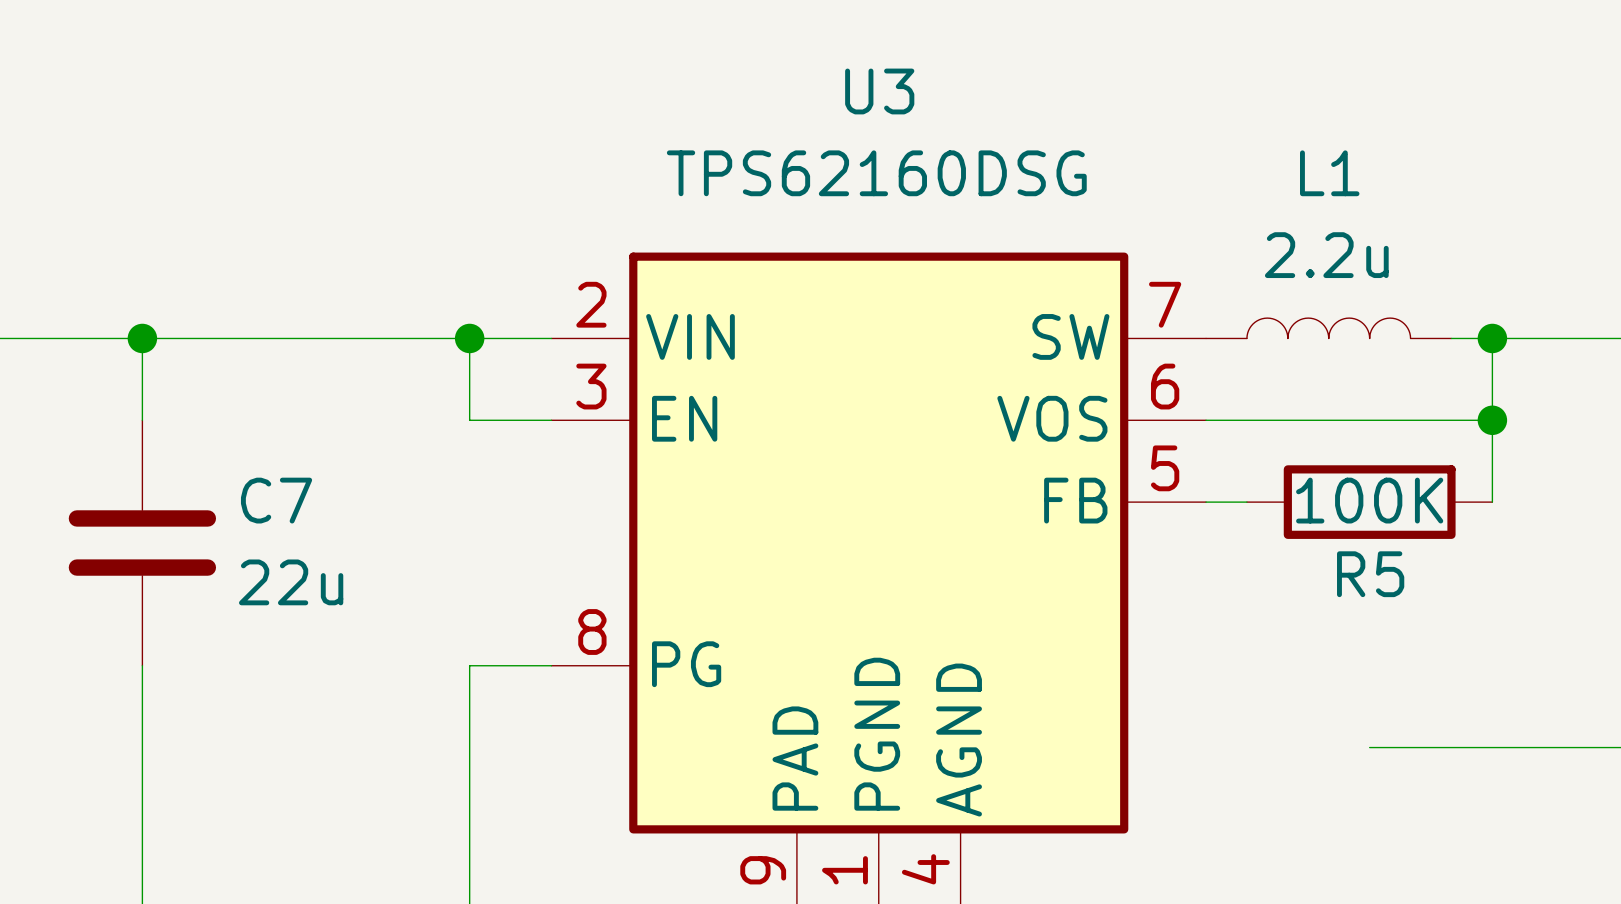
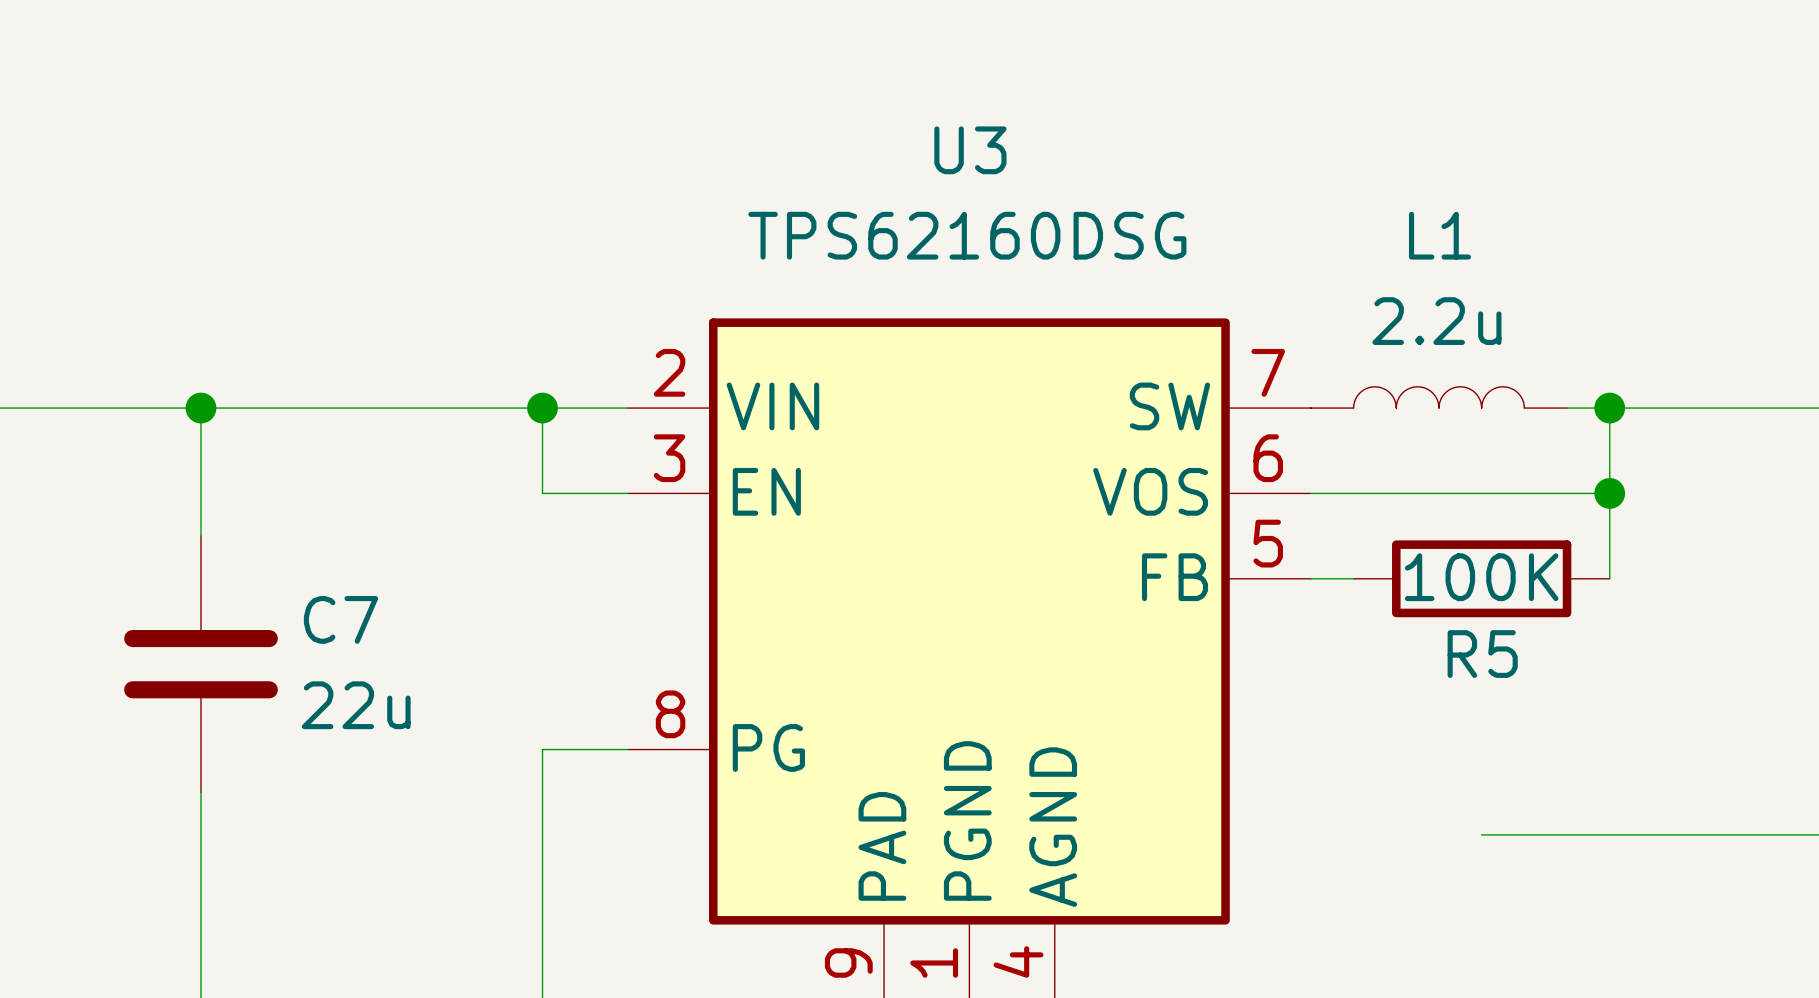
C7 position: (142, 543) -> (201, 664)

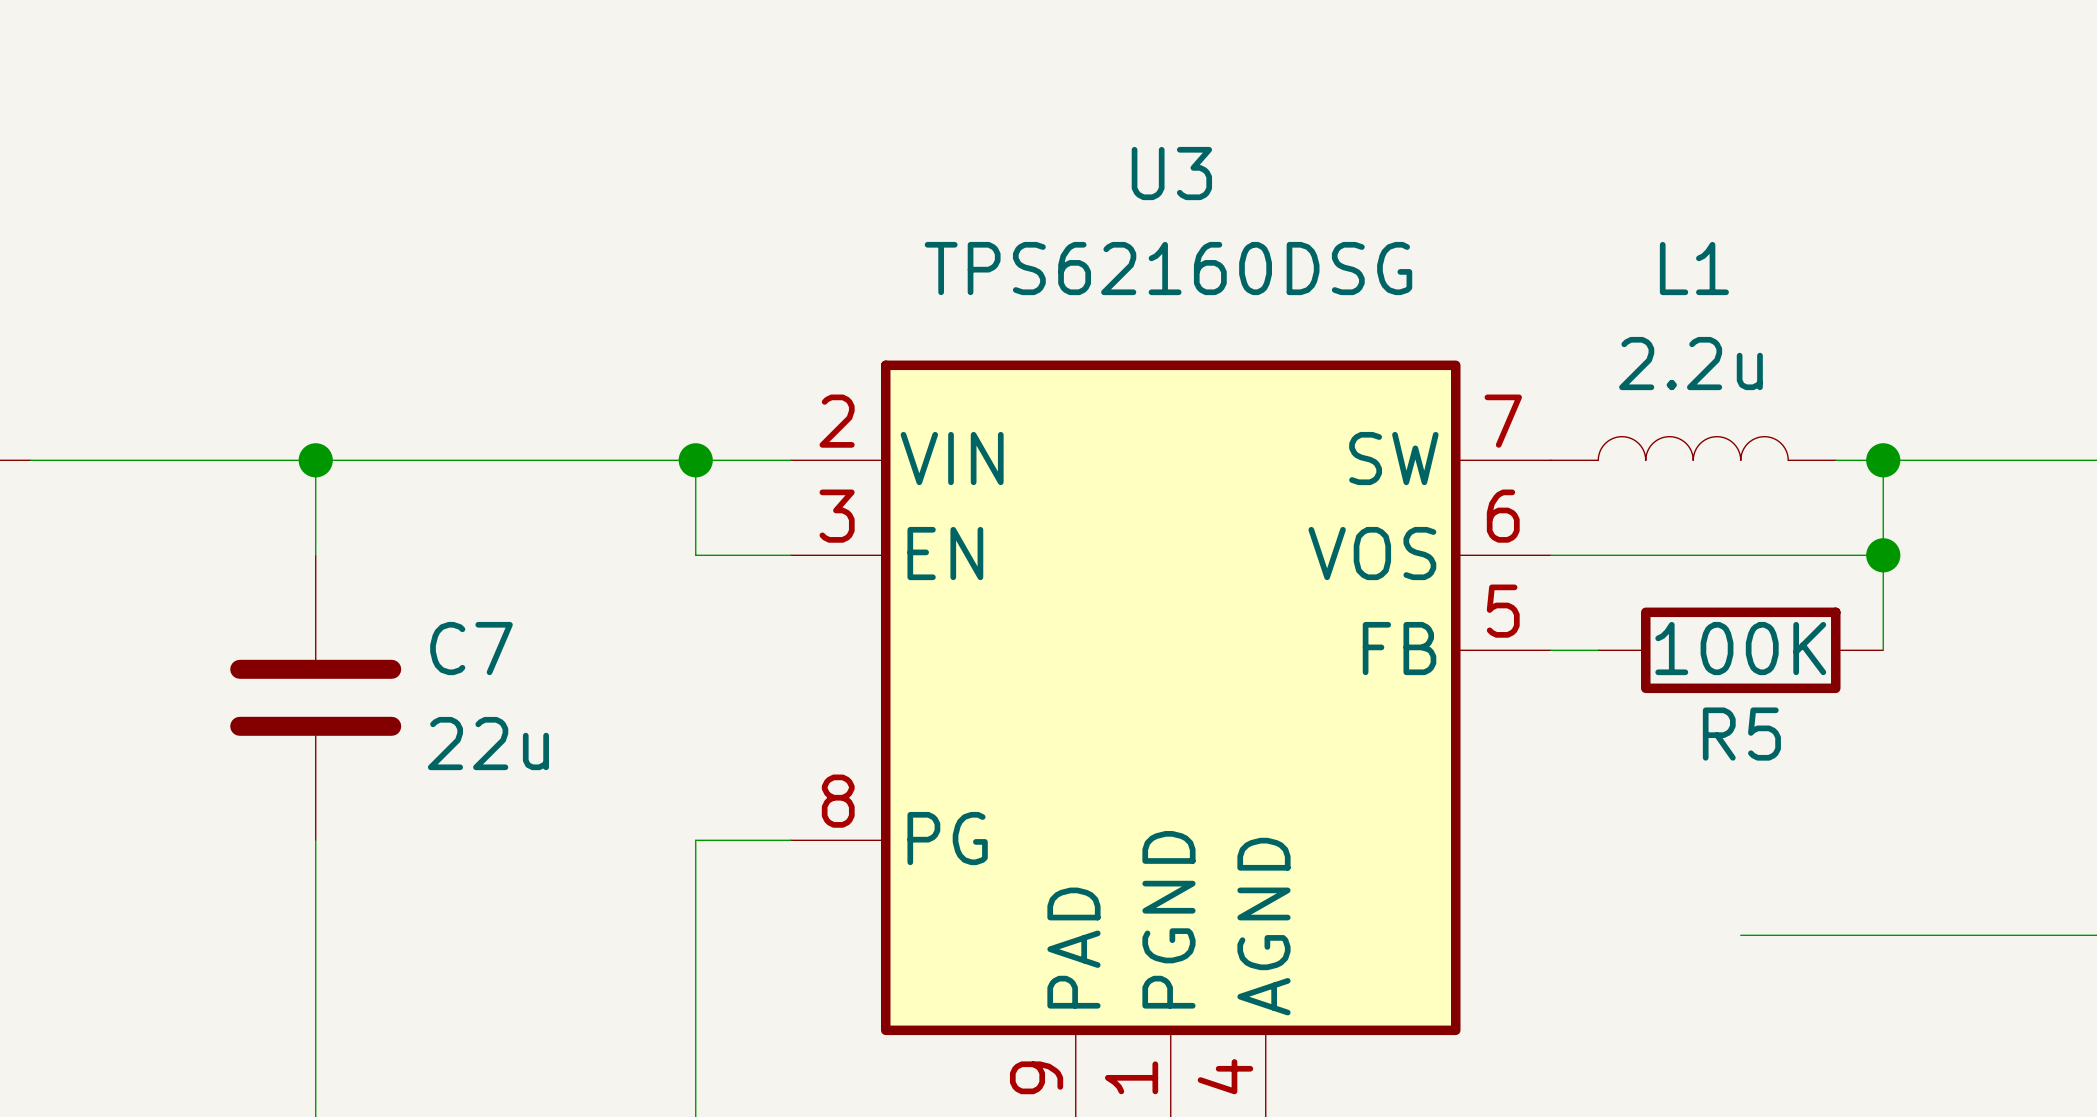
C7 position: (201, 664) -> (315, 697)

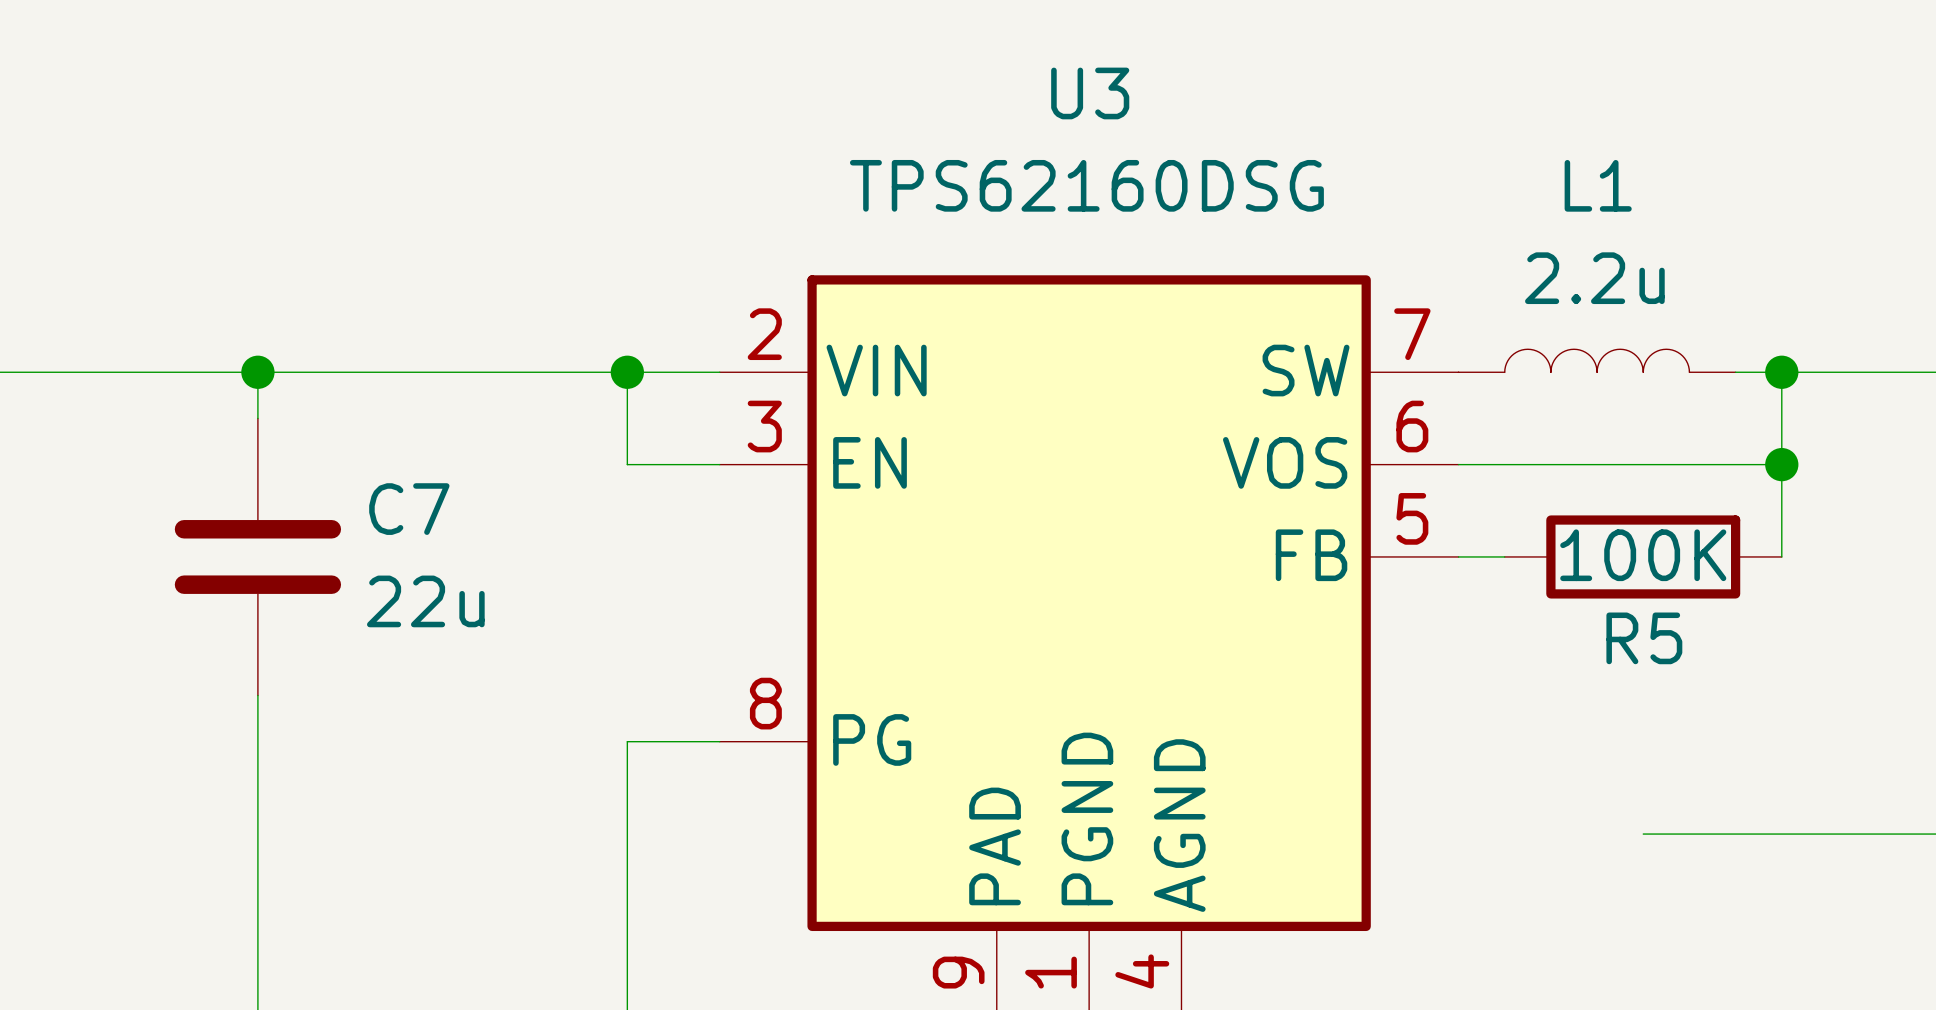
C7 position: (315, 697) -> (257, 556)

